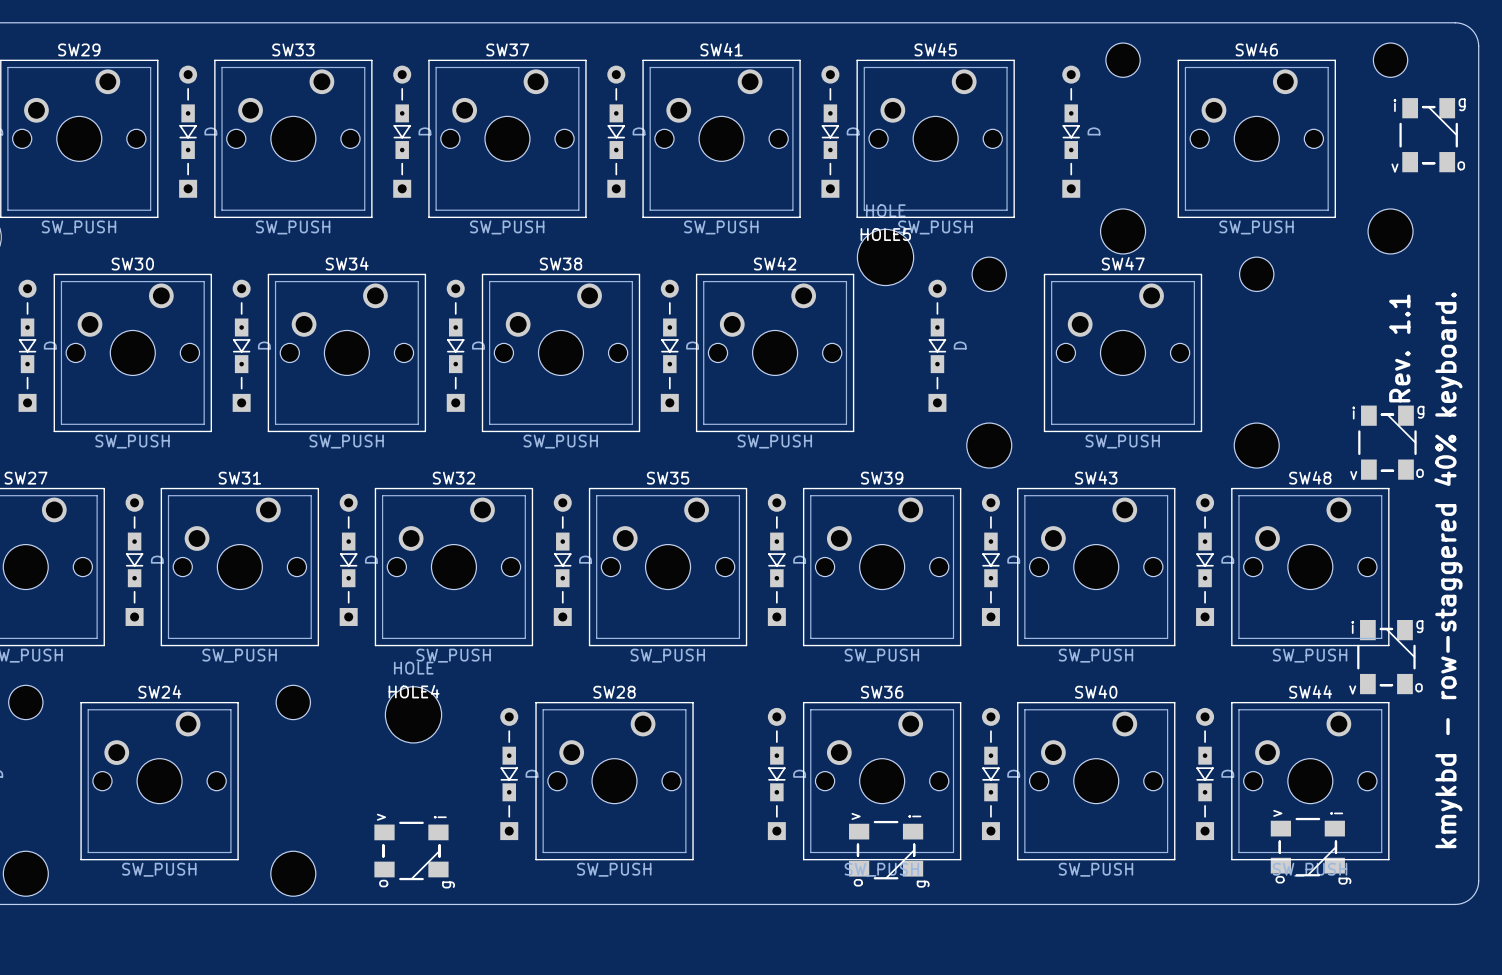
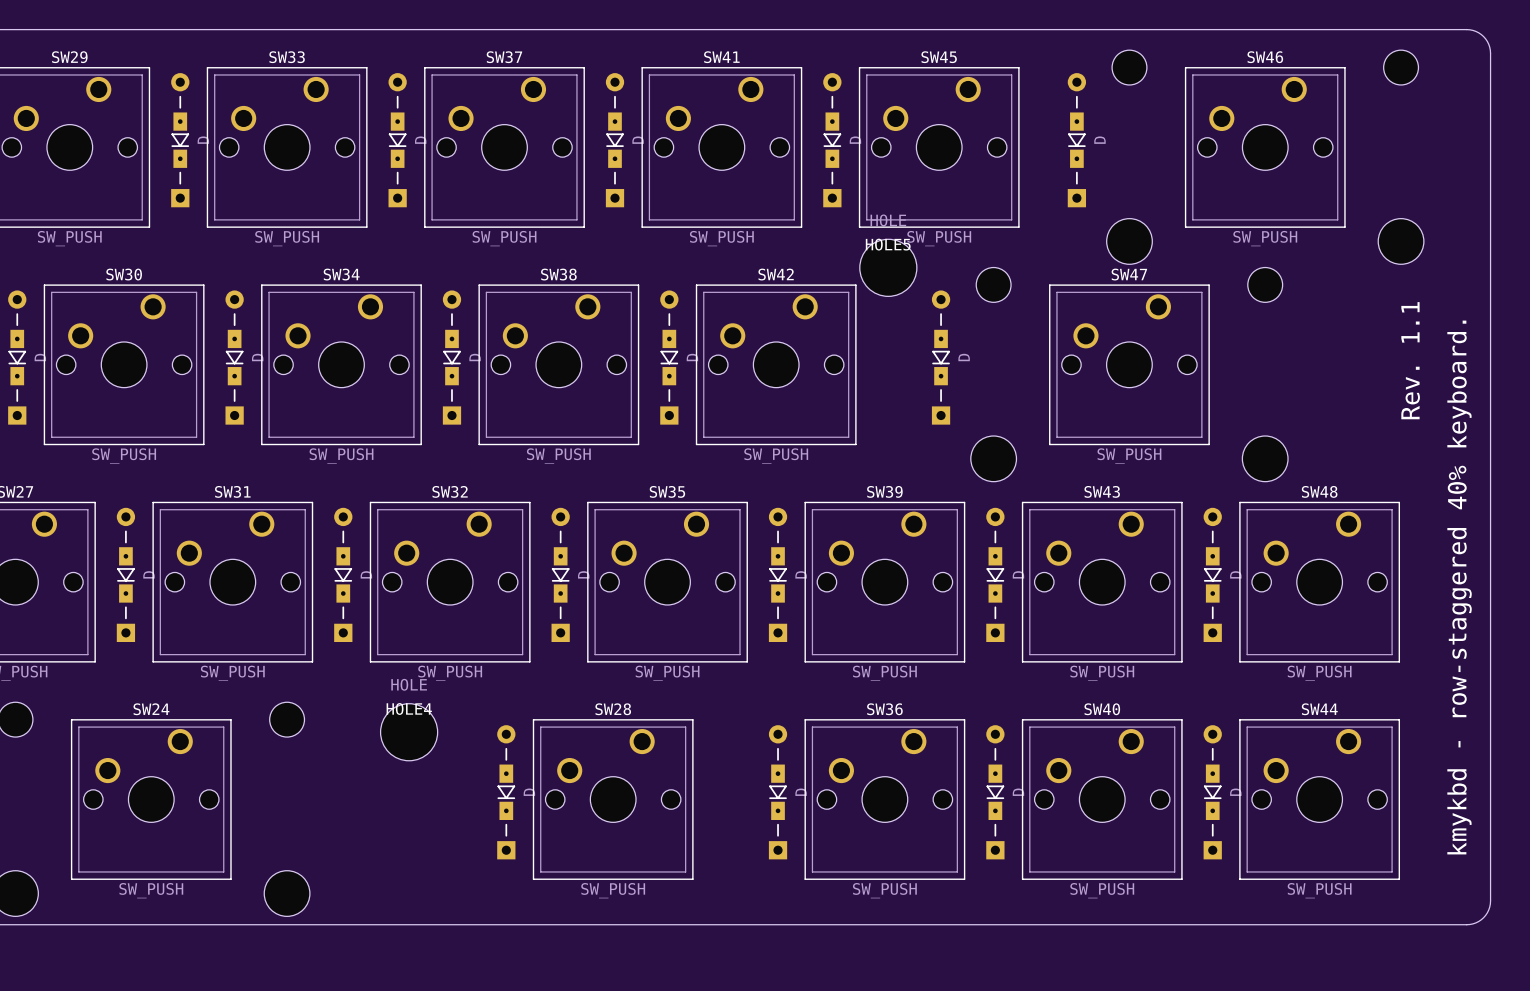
part: (1428, 135) -> none
part: (1387, 442) -> none
part: (1386, 657) -> none
part: (1307, 847) -> none
part: (411, 850) -> none
part: (886, 850) -> none

